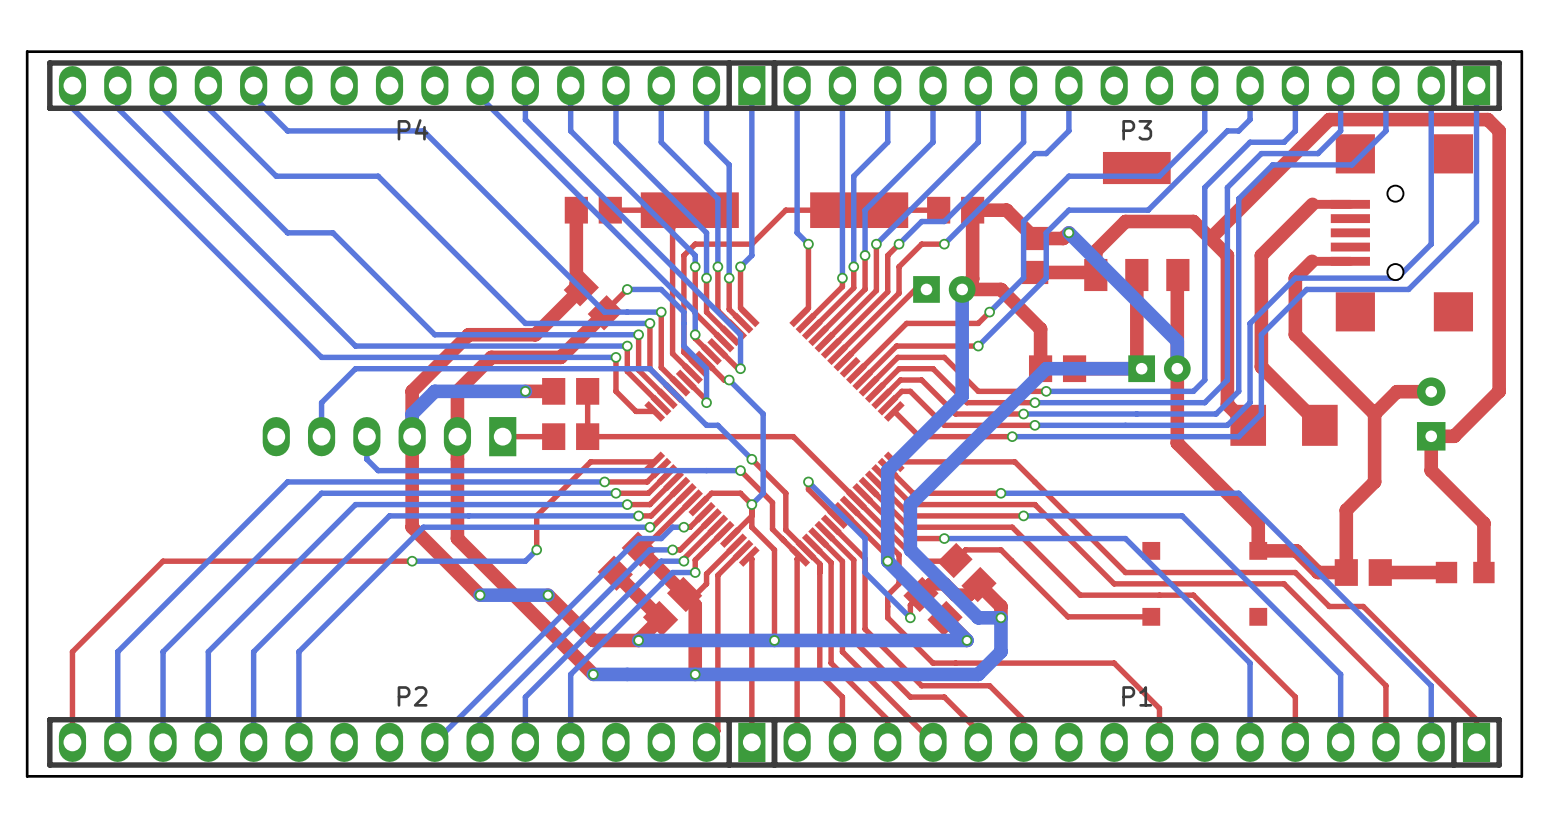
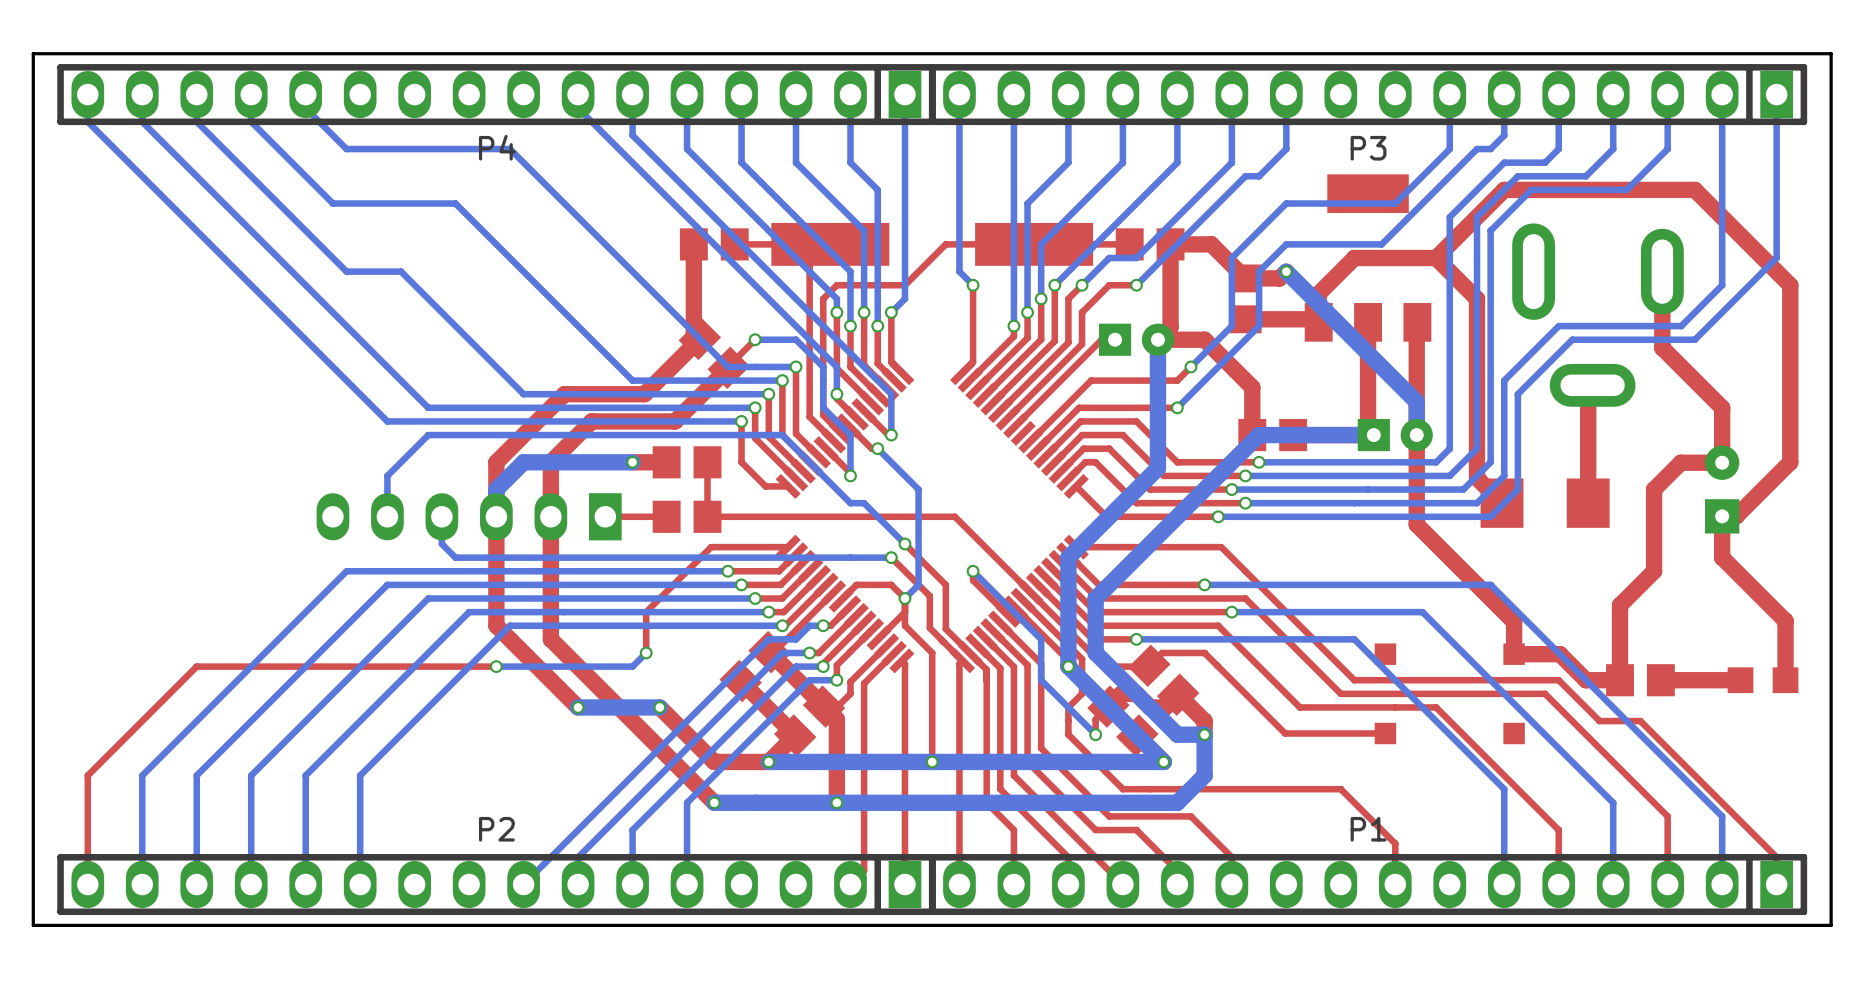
top track: (1350, 204) (1312, 204) (1261, 255) (1261, 366) (1319, 425) -> (1592, 385) (1588, 389) (1588, 503)
top track: none -> (1662, 271) (1662, 348) (1722, 407) (1722, 462)
part: (1401, 232) -> none
top track: (1210, 238) (1329, 119) (1487, 119) (1499, 130) (1499, 391) (1454, 436) (1442, 436) -> (1436, 258) (1504, 189) (1694, 189) (1790, 285) (1790, 462) (1736, 516)
top track: (1350, 261) (1312, 261) (1295, 278) (1295, 334) (1374, 414) -> none
part: none -> (1597, 315)

